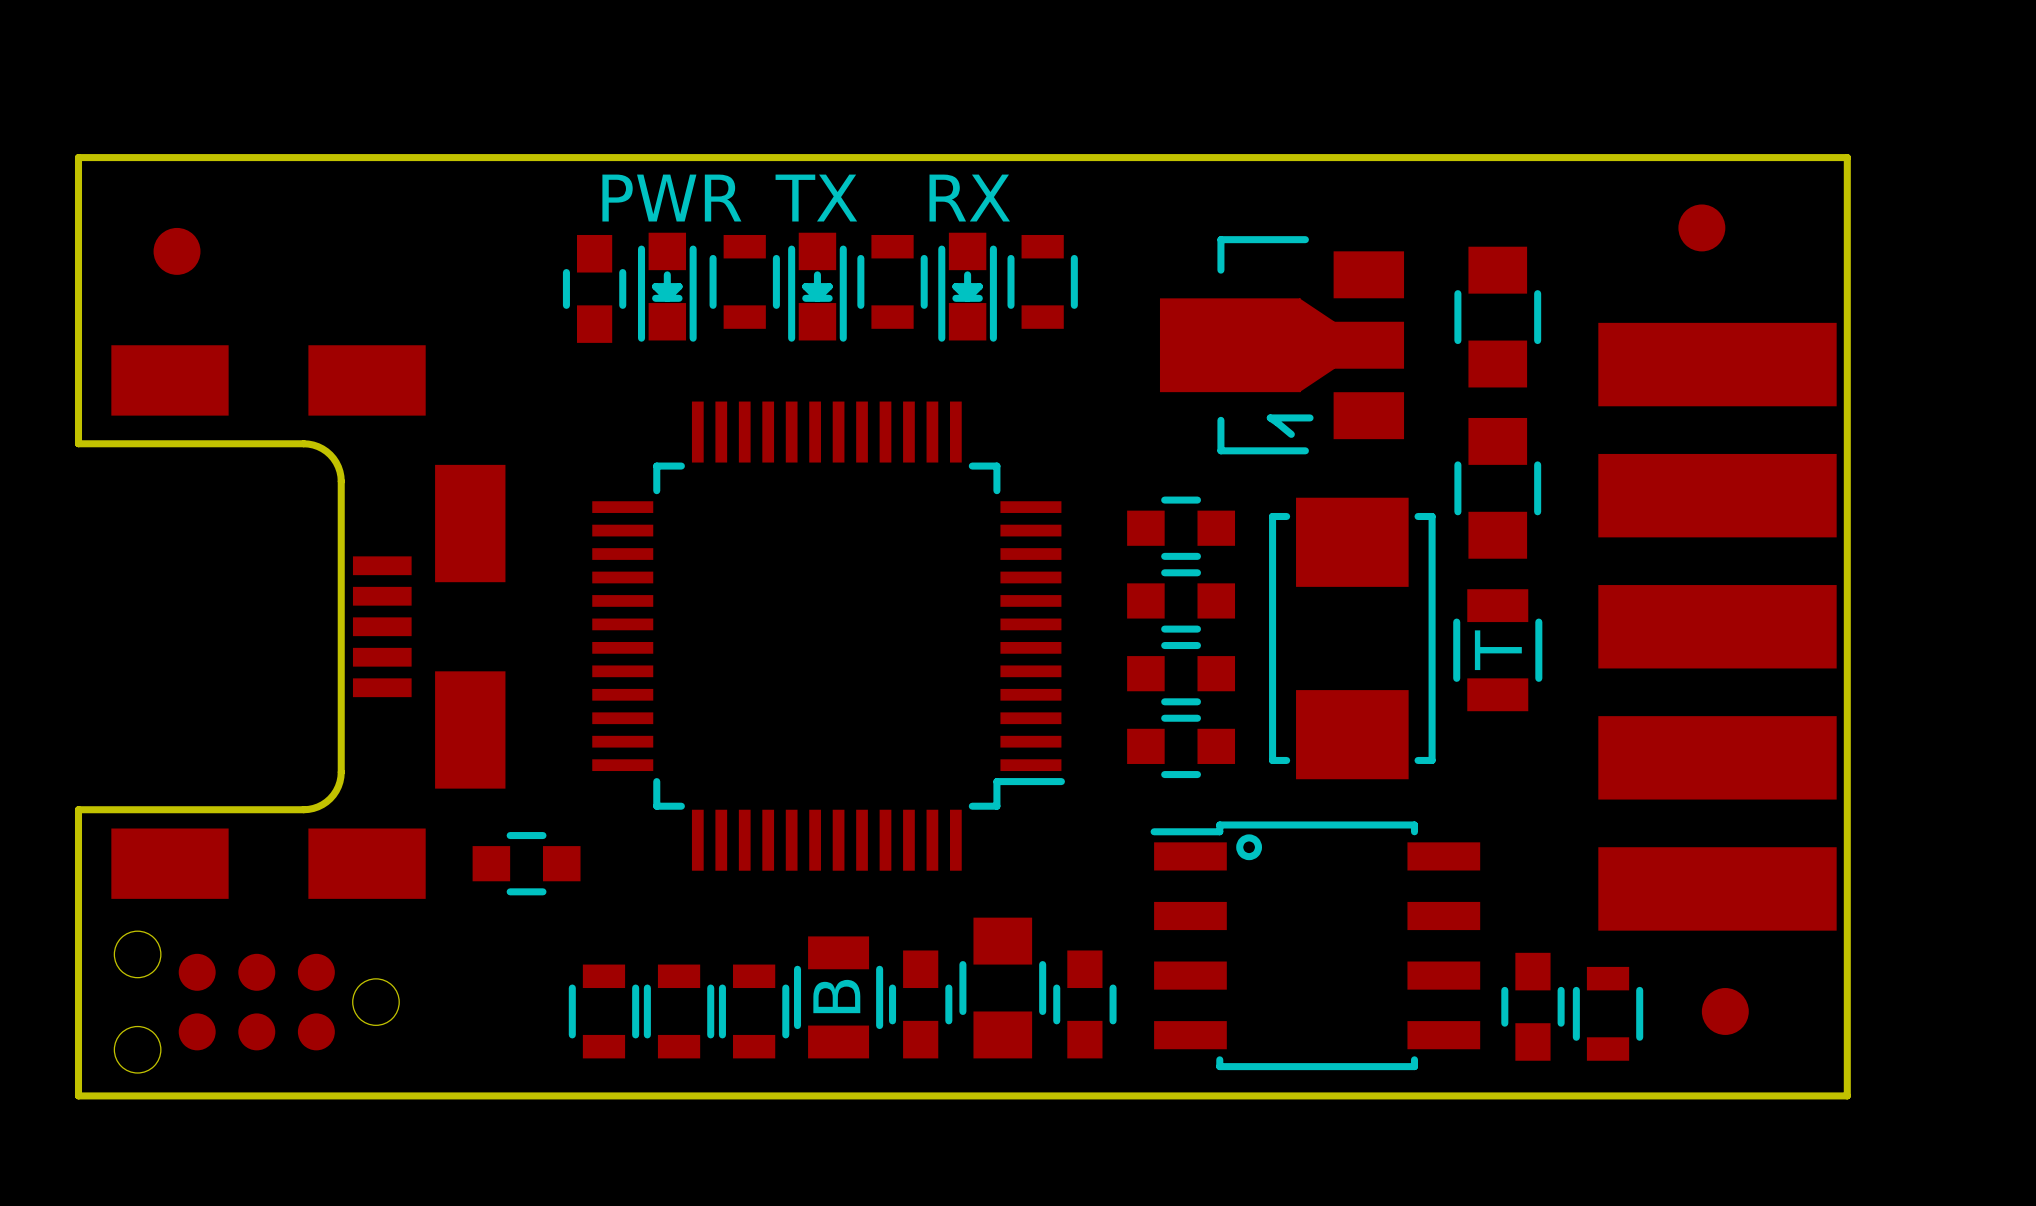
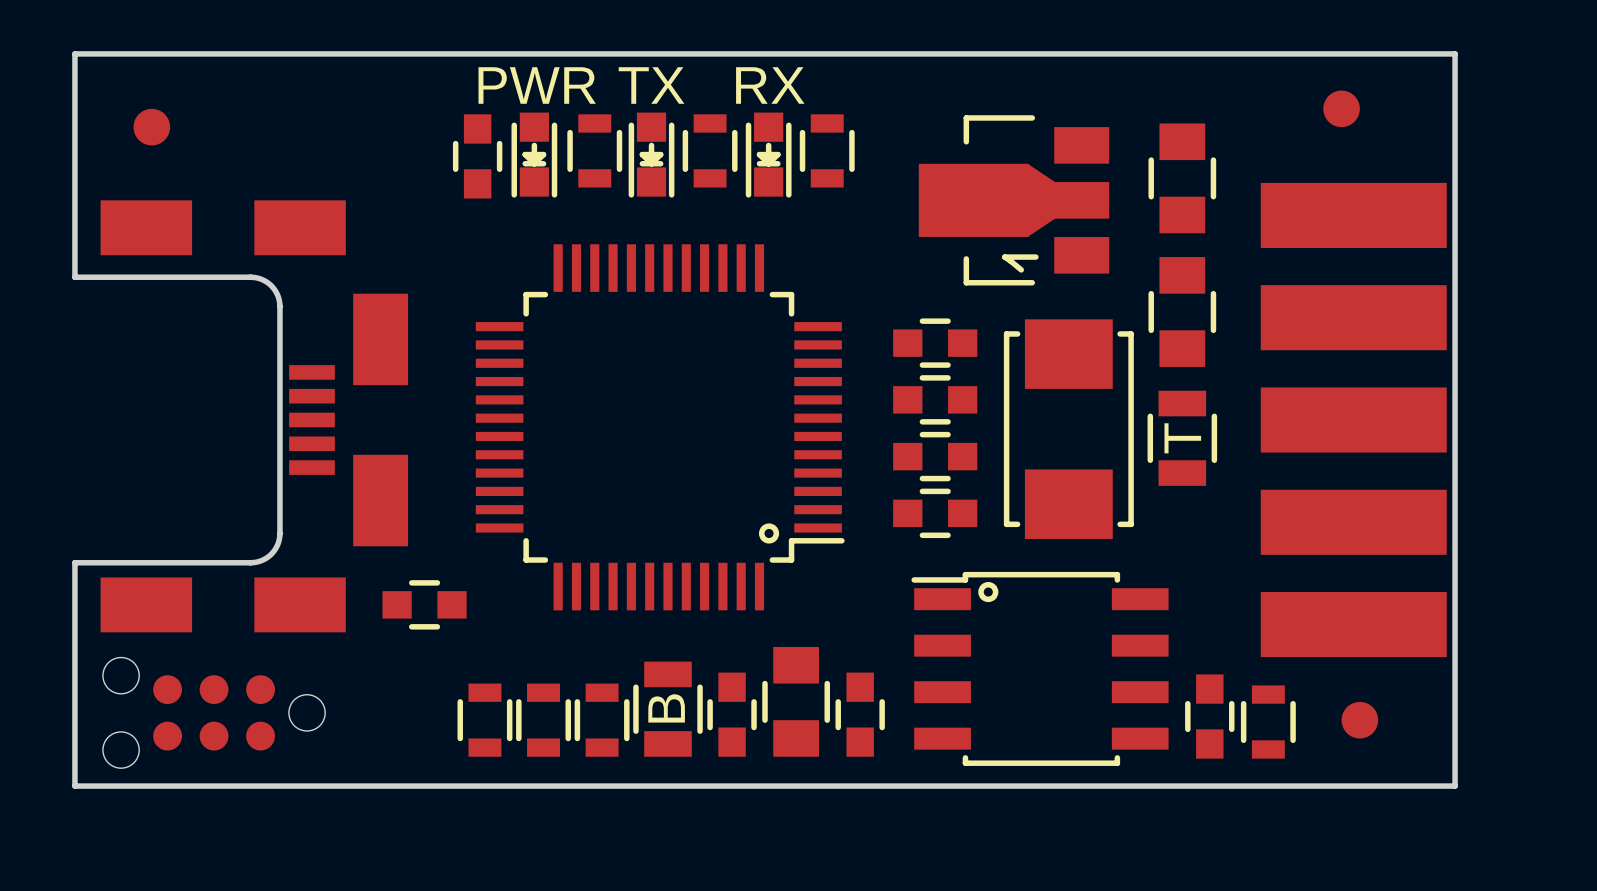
drawing: none -> [758, 523, 780, 544]

